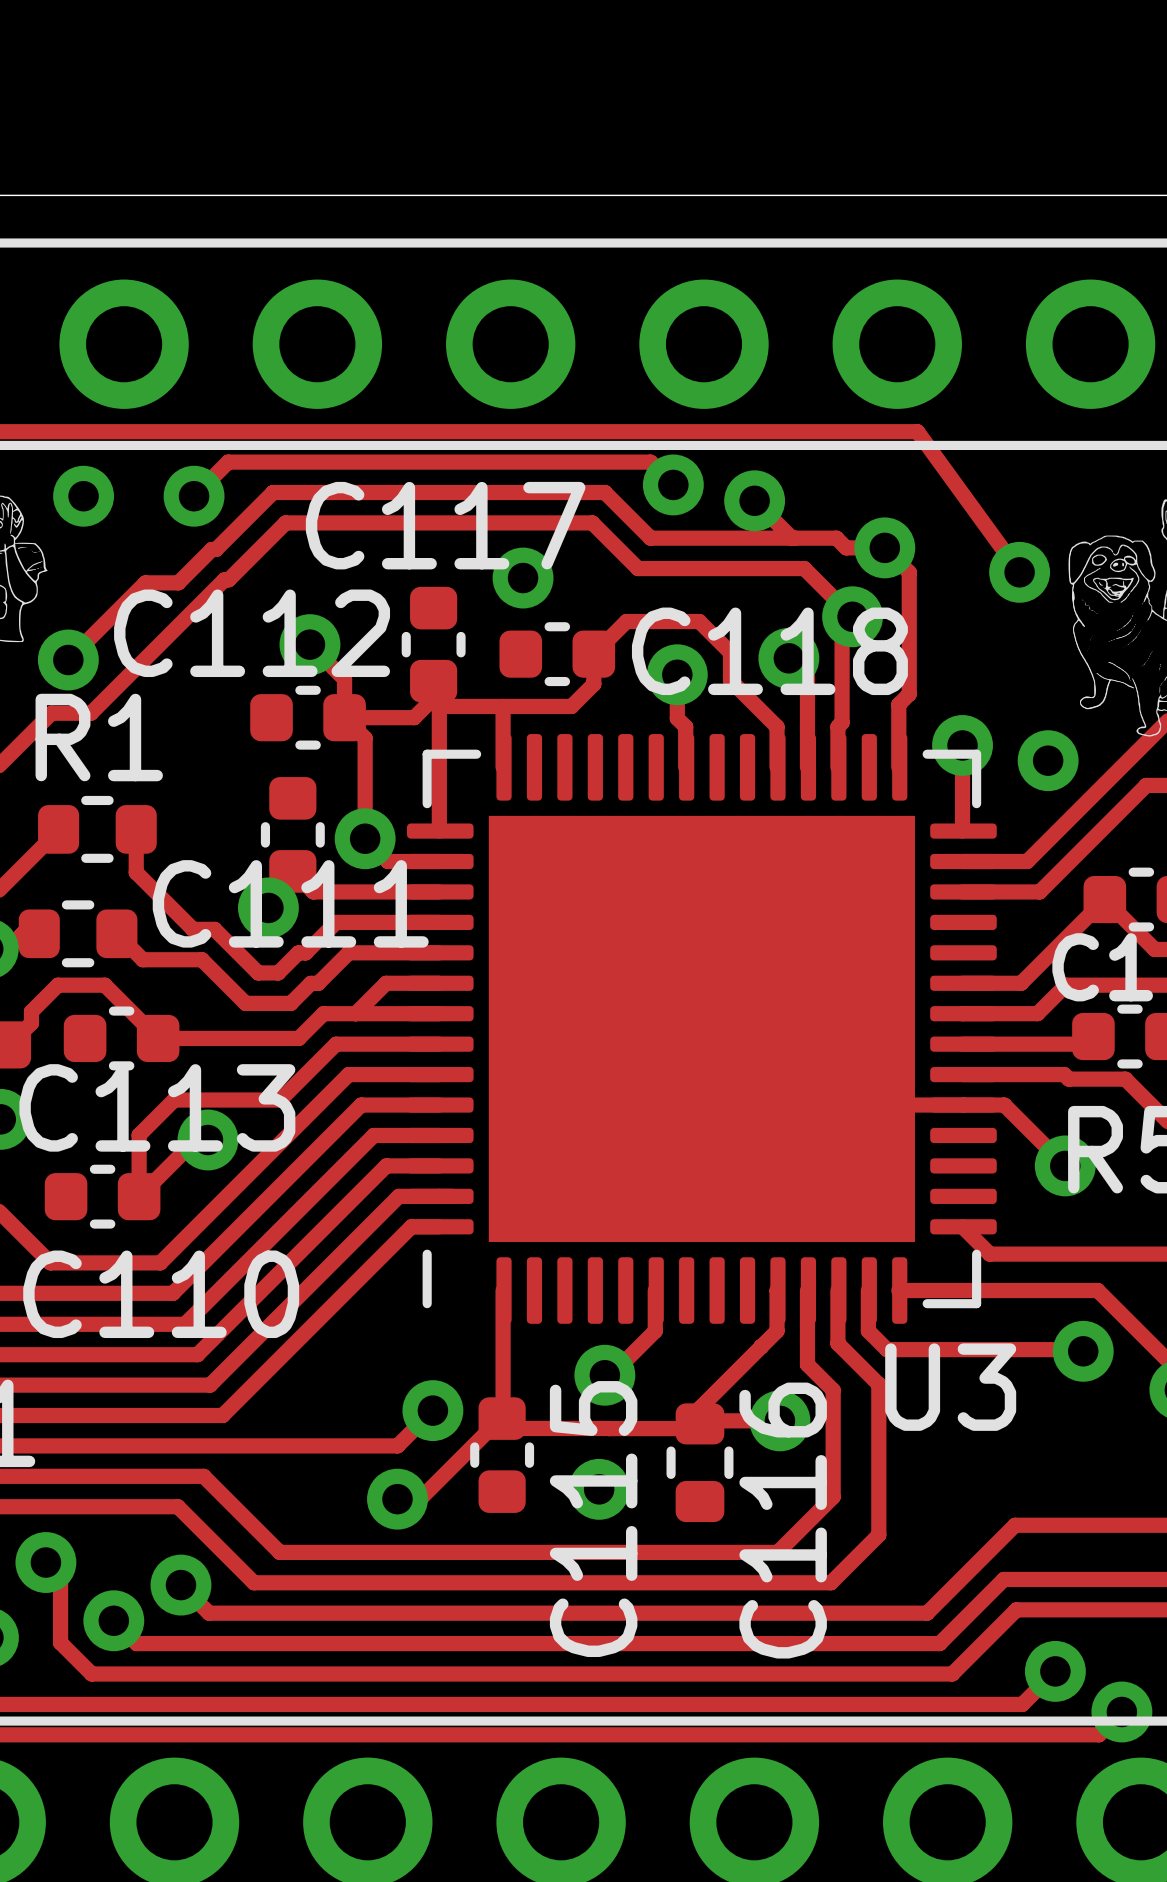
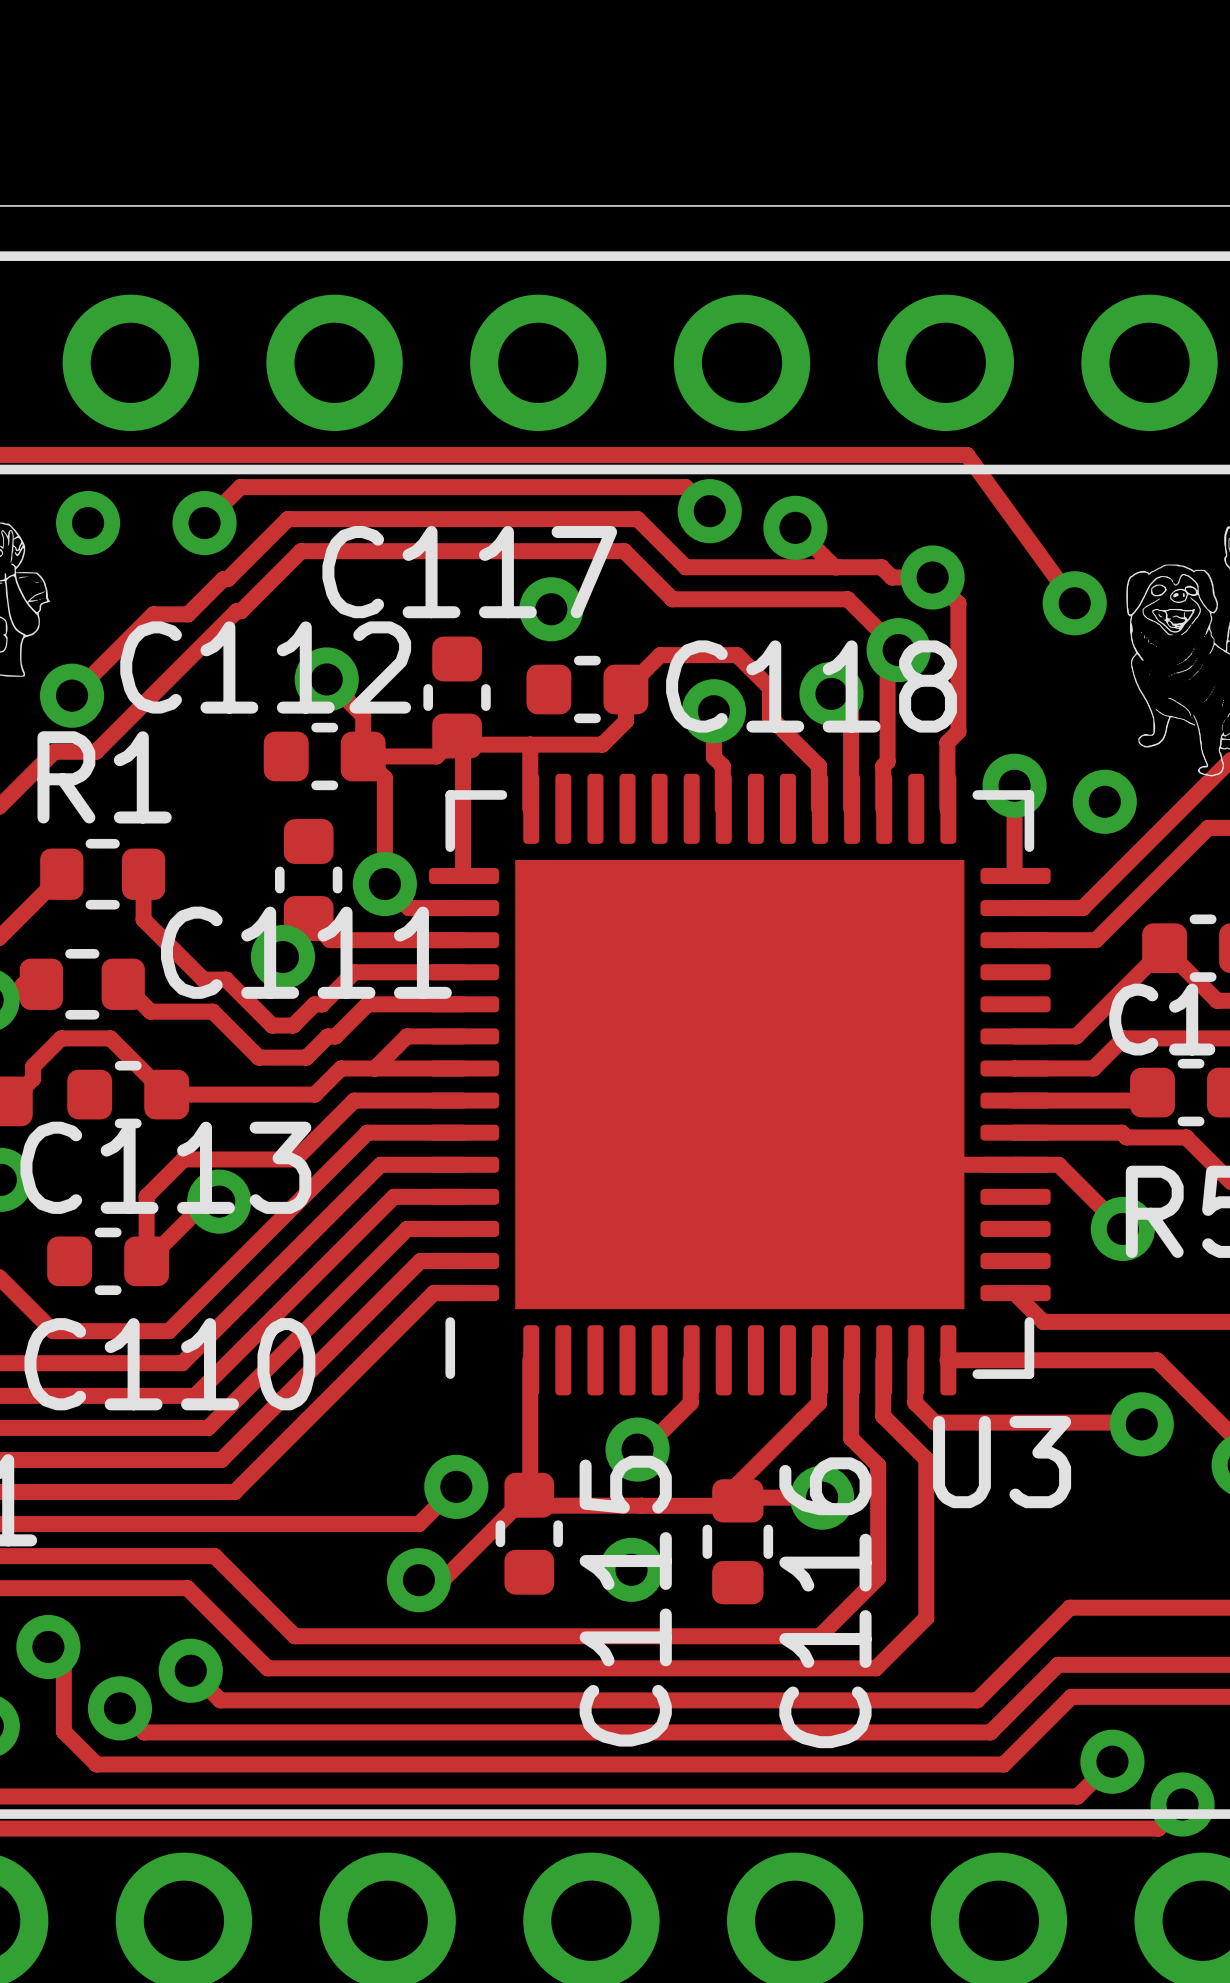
C117 position: (433, 644) -> (457, 697)

